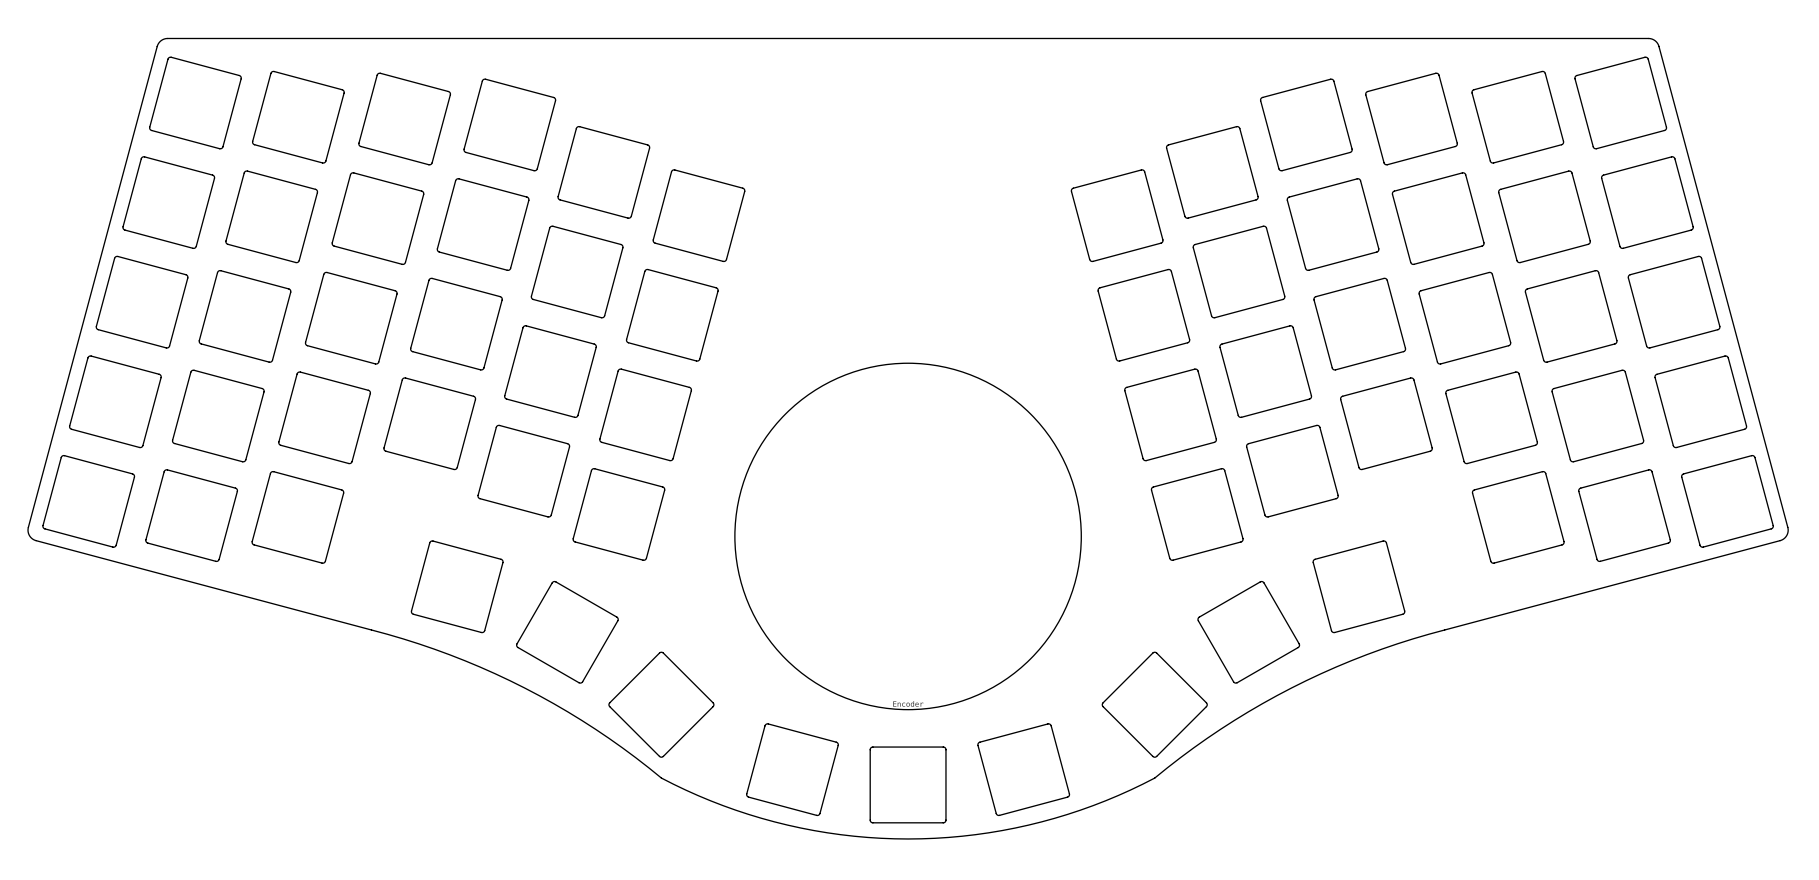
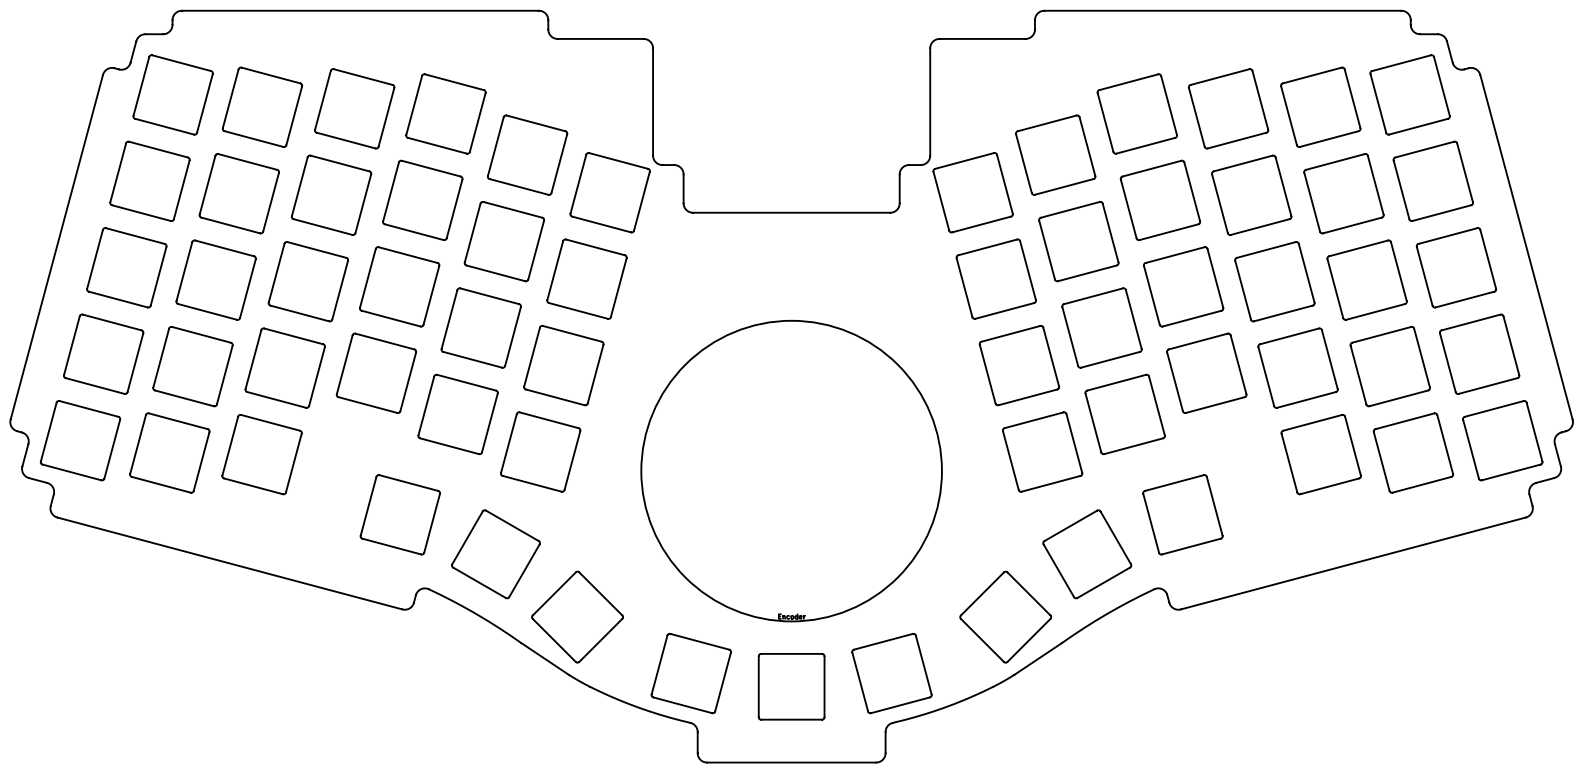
board edge: (638, 38) (167, 38) (161, 40) (157, 46) (28, 532) (36, 540) (387, 634) (464, 660) (509, 680) (567, 711) (609, 738) (661, 778) (697, 795) (735, 810) (774, 821) (814, 830) (854, 836) (908, 838) (948, 837) (1002, 830) (1041, 821) (1080, 810) (1118, 795) (1154, 778) (1207, 738) (1262, 703) (1321, 673) (1366, 654) (1428, 634) (1780, 540) (1787, 533) (1787, 527) (1658, 46) (1655, 40) (1648, 38) (1177, 38) -> (557, 38) (553, 37) (549, 33) (546, 15) (538, 10) (181, 10) (173, 15) (171, 27) (168, 32) (139, 36) (128, 67) (122, 69) (109, 68) (103, 74) (10, 423) (13, 429) (24, 433) (28, 439) (22, 467) (23, 474) (28, 477) (48, 483) (53, 488) (50, 509) (55, 516) (403, 609) (412, 606) (418, 590) (427, 588) (487, 620) (590, 686) (639, 707) (693, 724) (697, 730) (698, 756) (701, 760) (707, 762) (879, 762) (885, 755) (885, 730) (889, 724) (944, 707) (993, 686) (1095, 620) (1154, 589) (1163, 590) (1171, 606) (1179, 609) (1525, 517) (1530, 515) (1532, 509) (1529, 493) (1531, 486) (1556, 477) (1560, 472) (1561, 467) (1554, 439) (1558, 434) (1570, 428) (1572, 419) (1480, 74) (1473, 68) (1460, 69) (1455, 67) (1443, 36) (1415, 32) (1411, 27) (1409, 15) (1401, 10) (1044, 10) (1036, 15) (1034, 33) (1025, 38)
board edge: (737, 38) (1078, 38) -> (643, 38) (650, 41) (653, 47) (653, 157) (659, 164) (675, 165) (681, 168) (683, 174) (683, 205) (687, 210) (693, 212) (895, 211) (899, 204) (901, 169) (906, 165) (923, 164) (929, 157) (930, 47) (933, 40) (939, 38)

